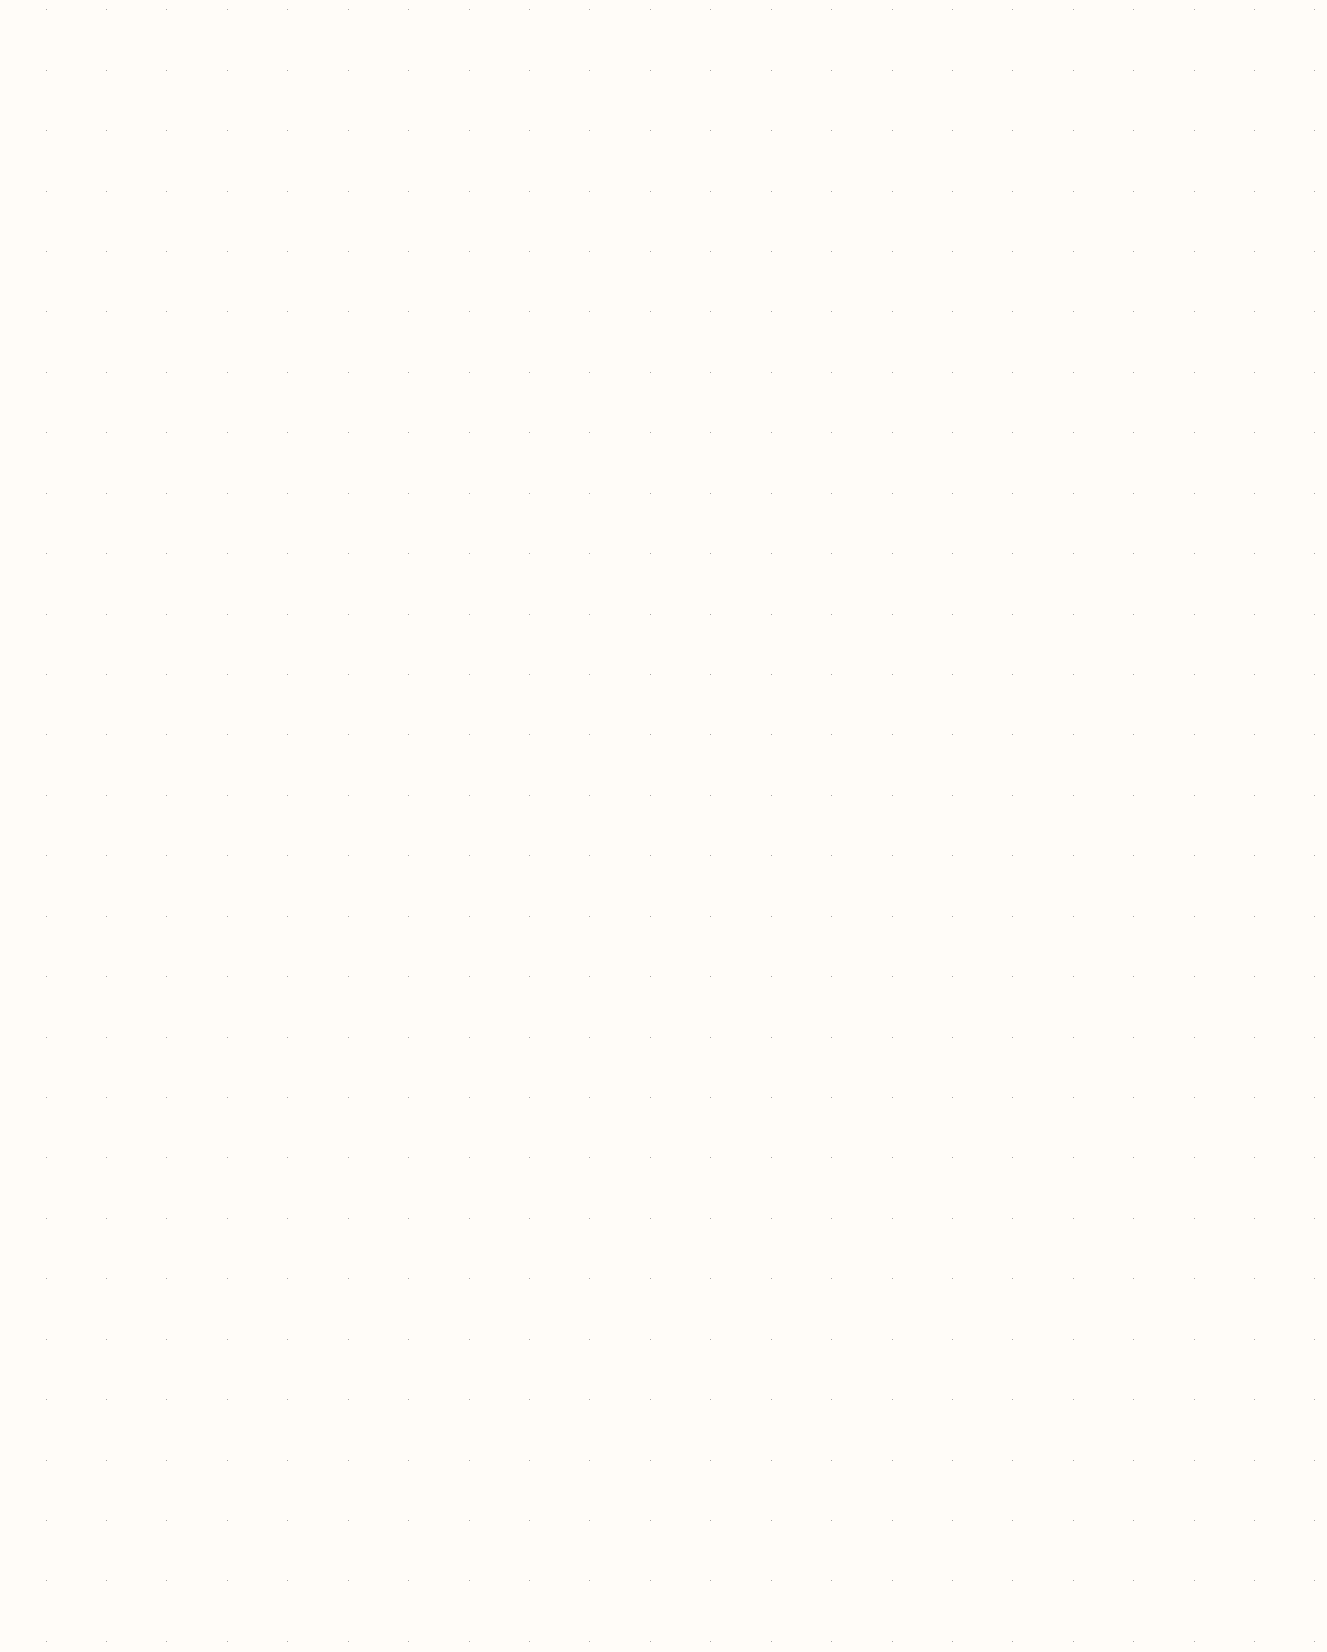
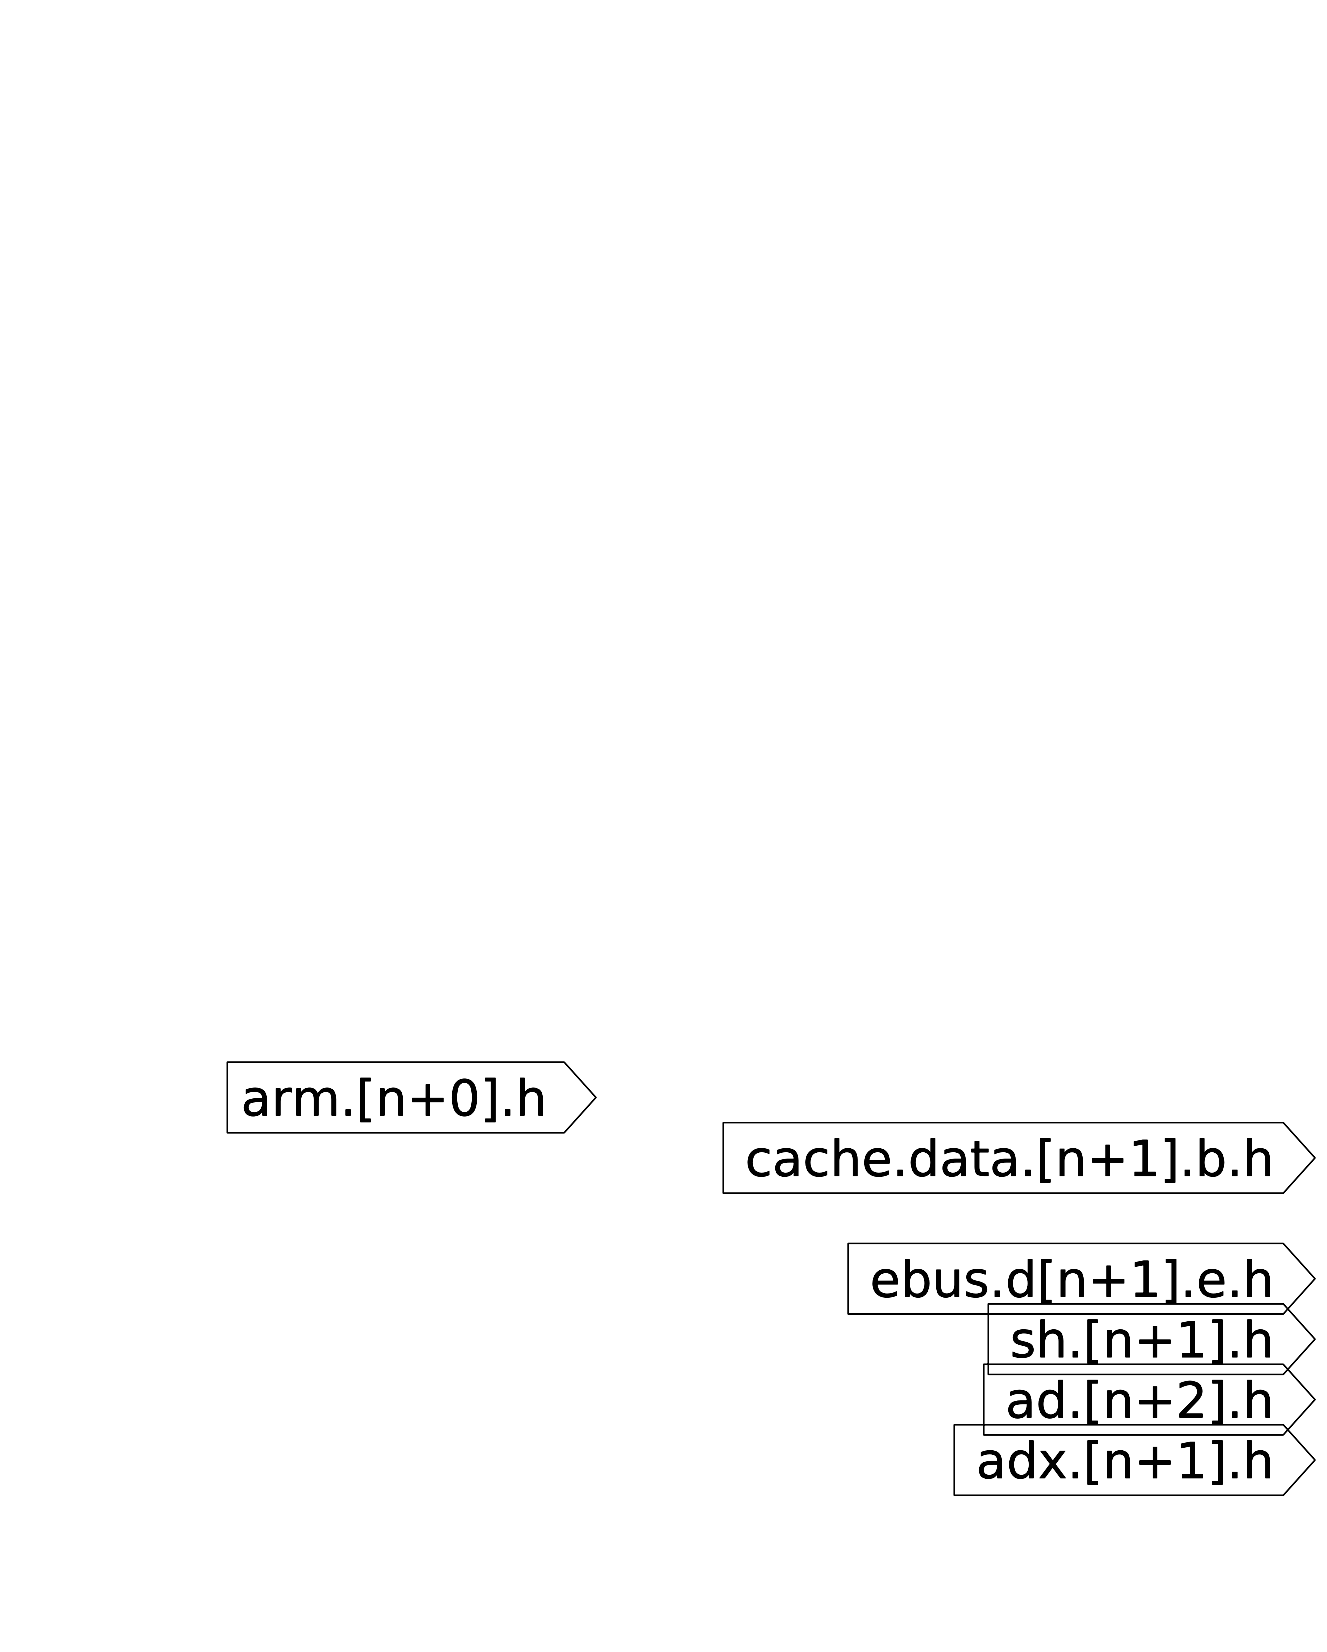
global label: none -> arm.[n+0].h (393, 1099)
global label: none -> cache.data.[n+1].b.h (1008, 1160)
global label: none -> ebus.d[n+1].e.h (1071, 1281)
global label: none -> sh.[n+1].h (1141, 1341)
global label: none -> ad.[n+2].h (1139, 1402)
global label: none -> adx.[n+1].h (1124, 1462)

